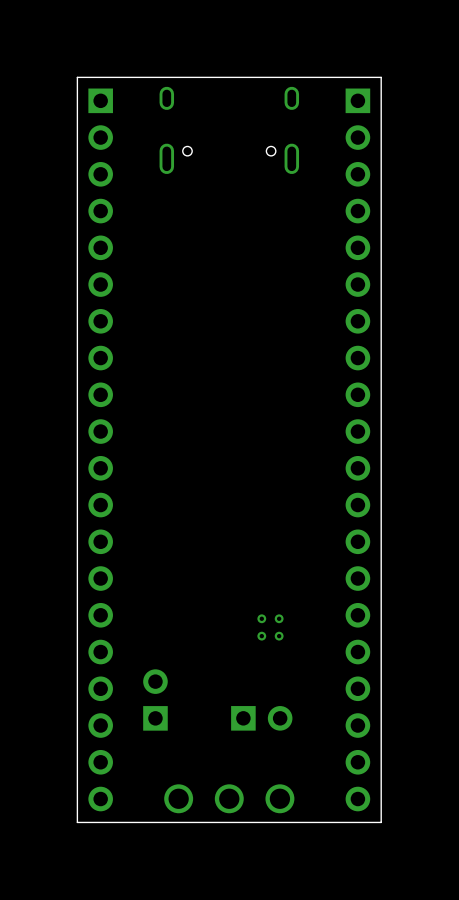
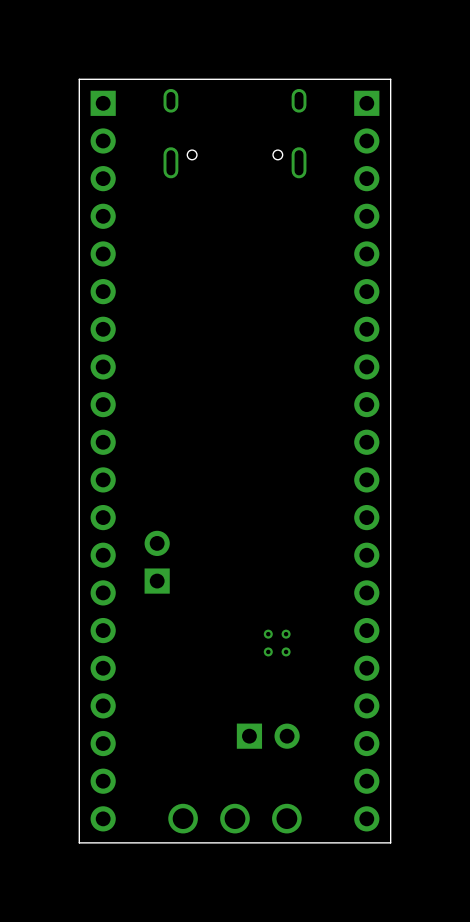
part position: (155, 700) -> (157, 562)

